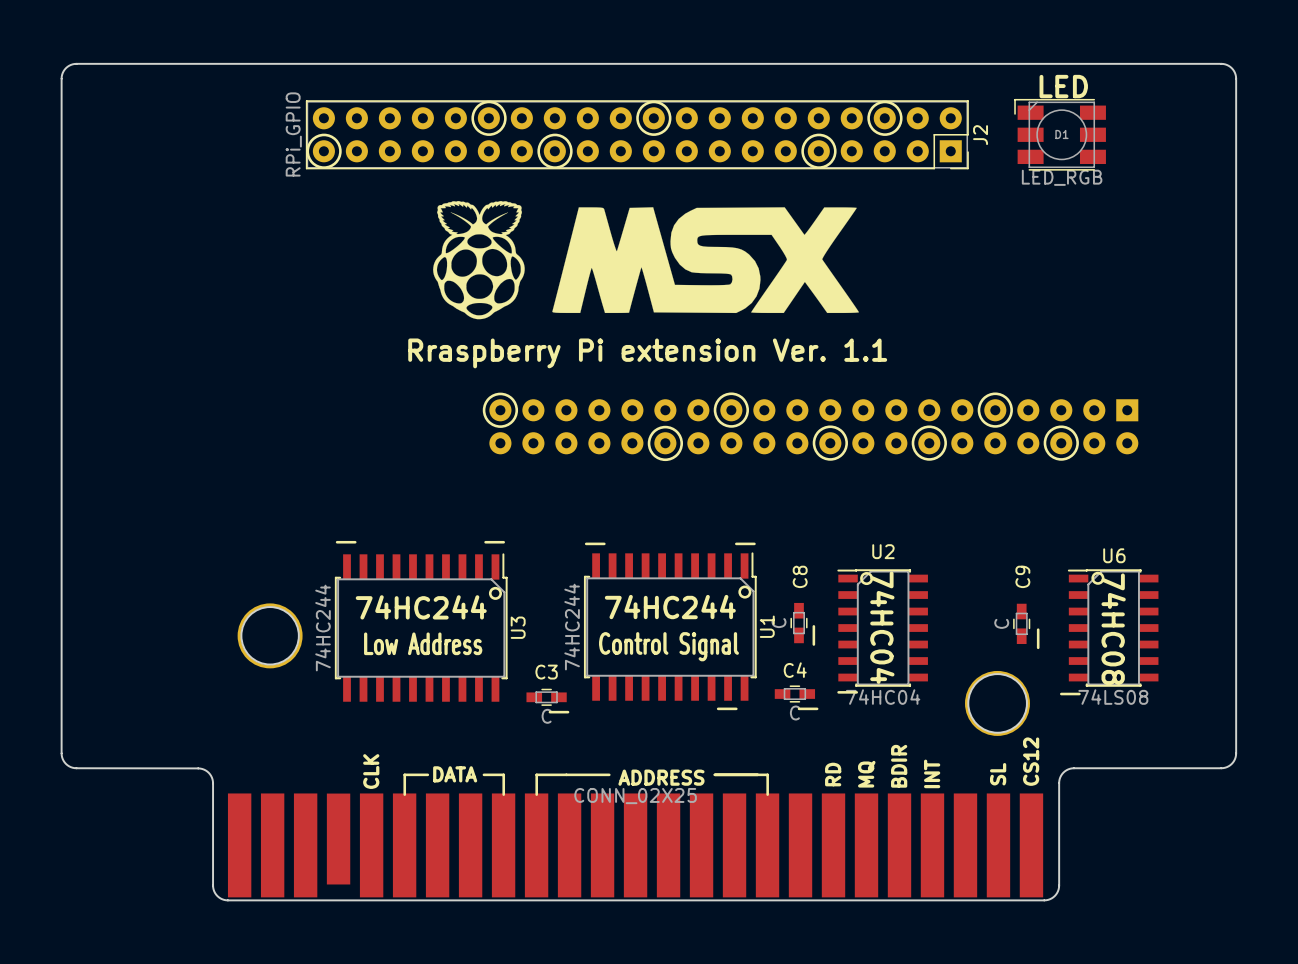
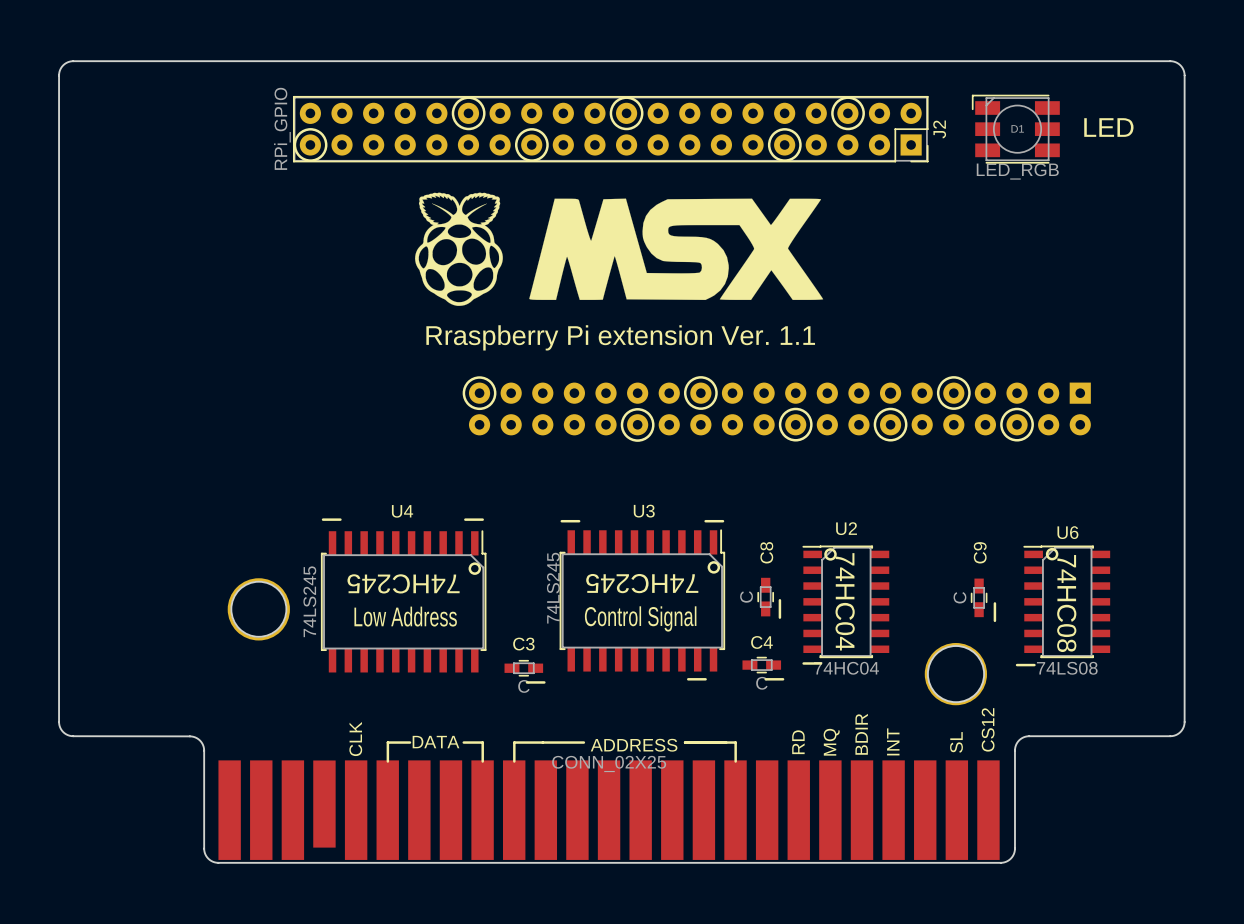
text position: LED (1063, 86) -> LED (1108, 127)
text: 74HC244 (421, 607) -> 74HC245 (403, 583)
text: 74HC244 (670, 607) -> 74HC245 (642, 583)
U1 name: U1 (767, 626) -> U3 (644, 511)
U3 name: U3 (518, 627) -> U4 (402, 511)
U1 value: 74HC244 (572, 627) -> 74LS245 (553, 588)
U3 value: 74HC244 (323, 628) -> 74LS245 (309, 601)

